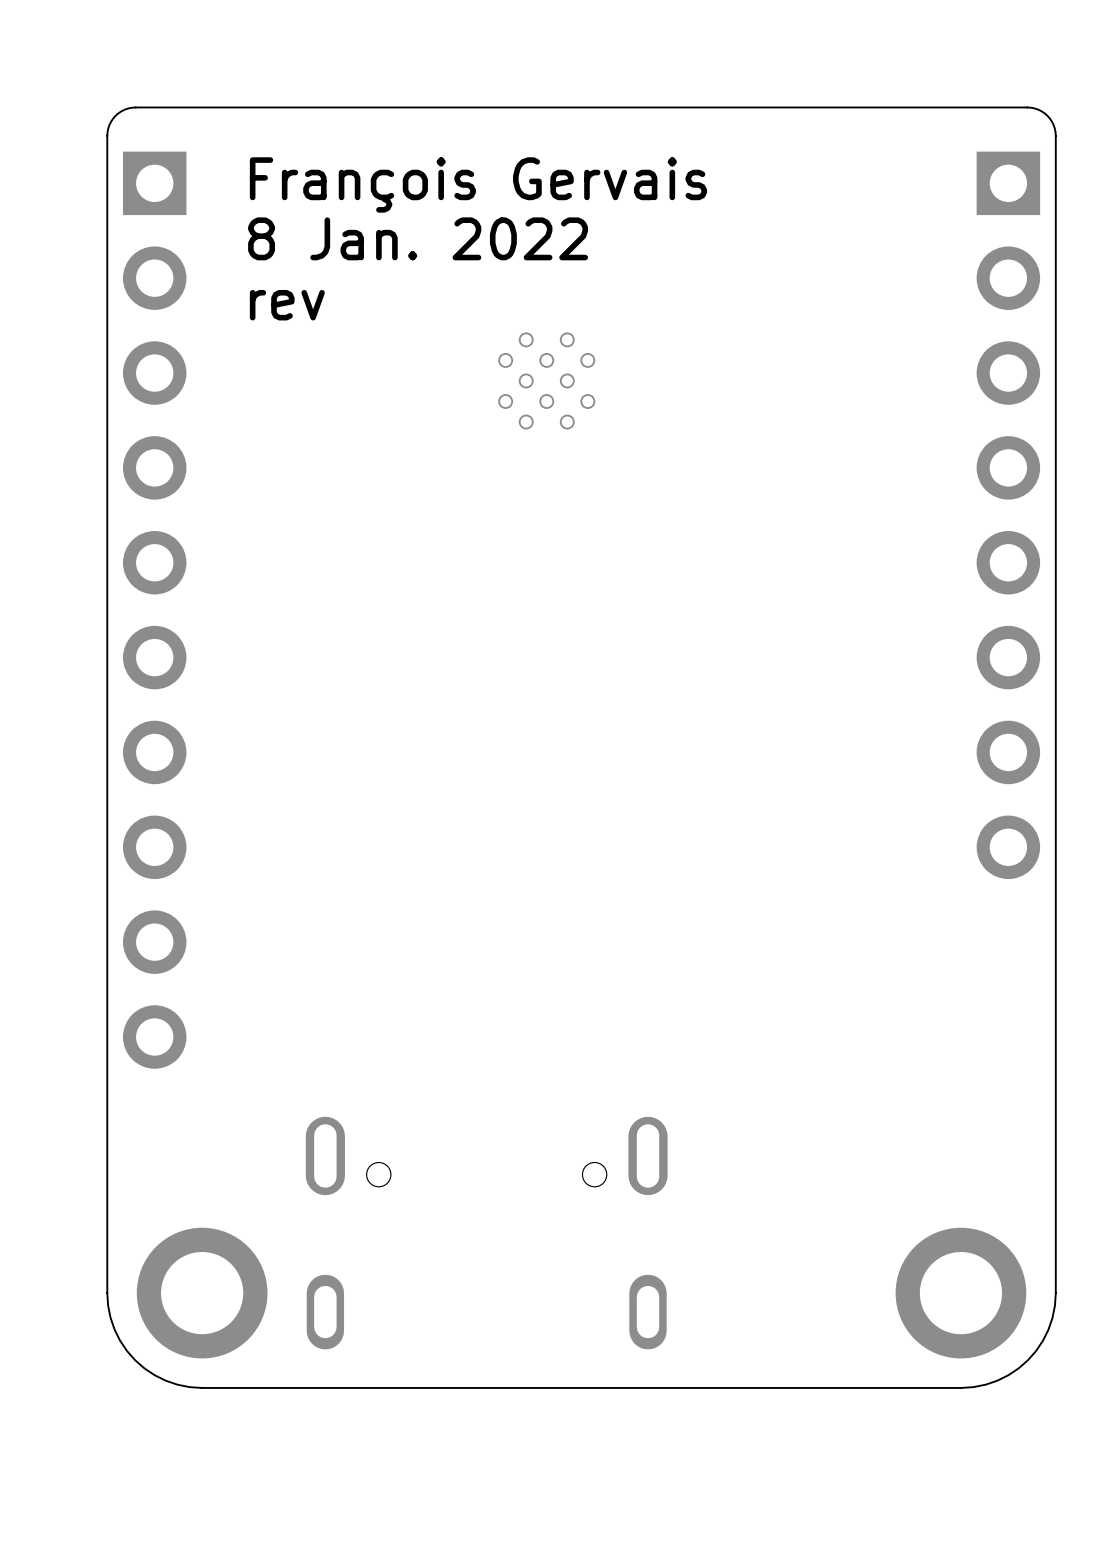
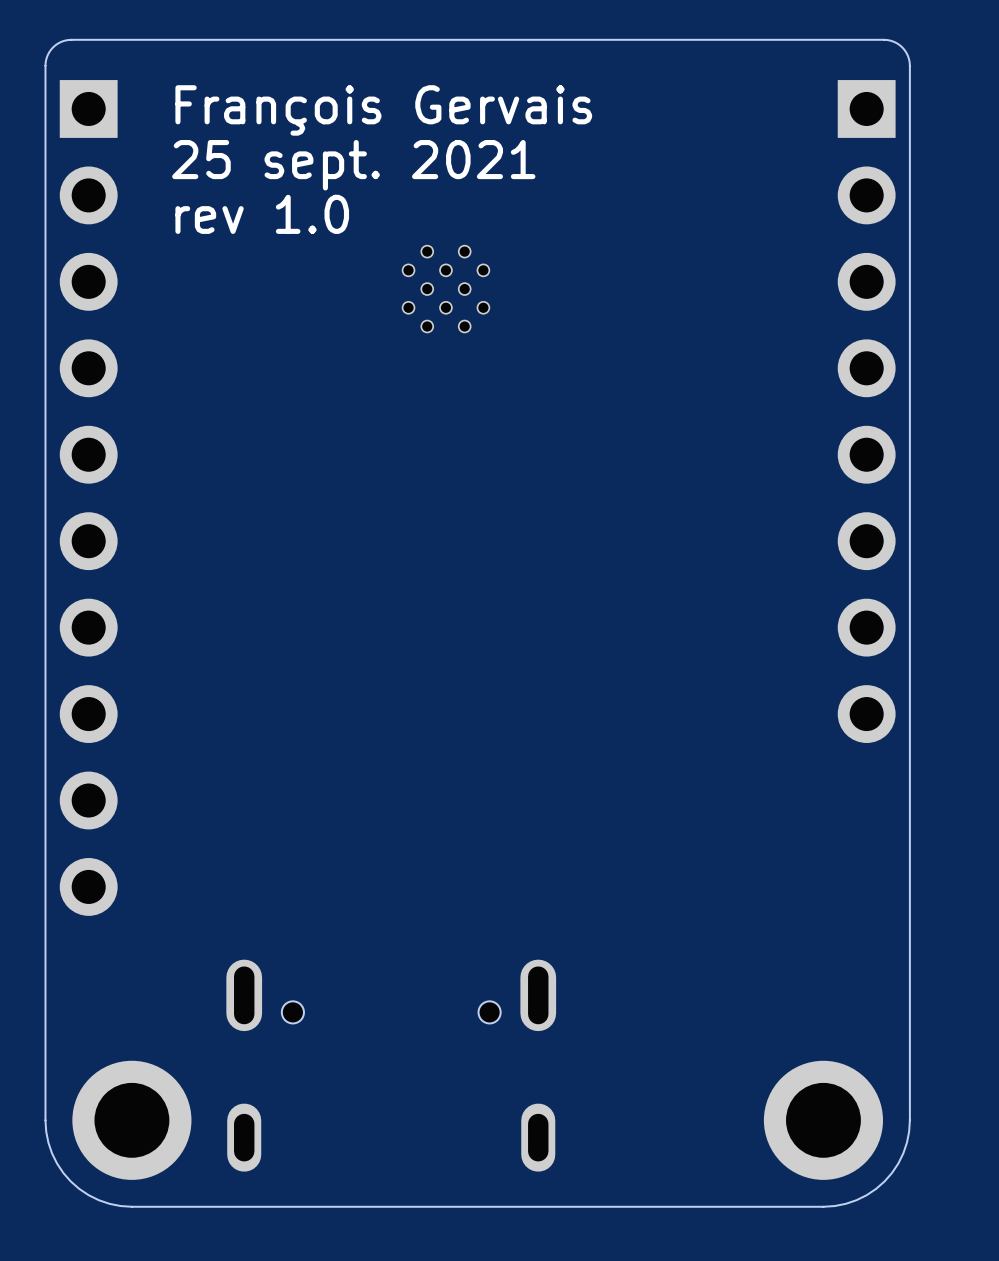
text: 8 Jan. 2022 (418, 238) -> 25 sept. 2021 (353, 165)
text: rev (287, 305) -> rev 1.0 (262, 214)

